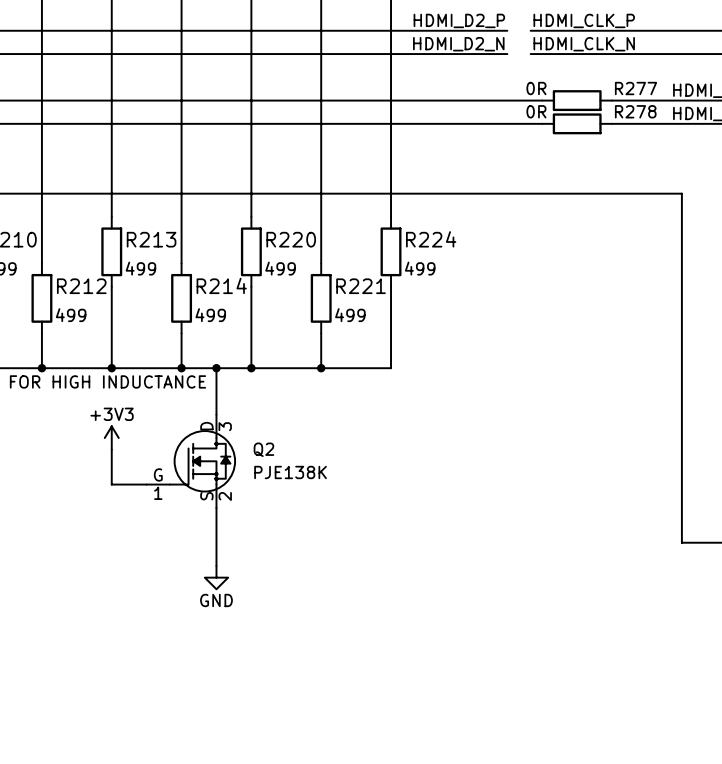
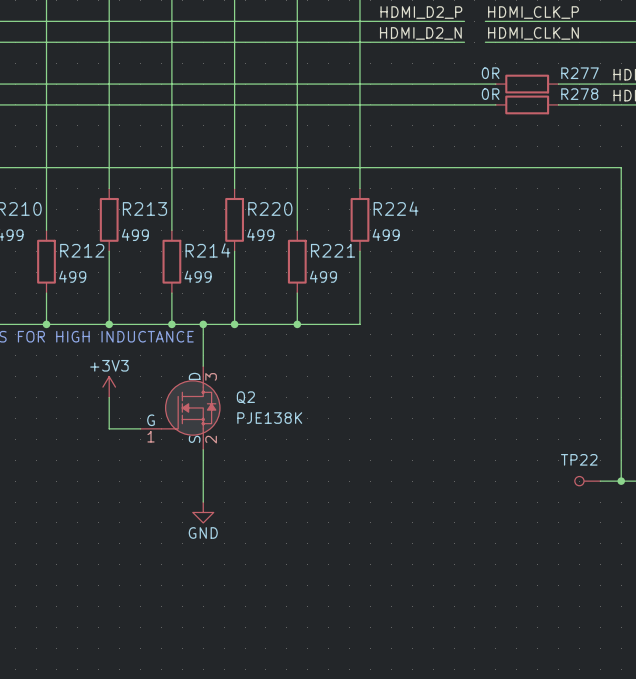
TP22: none -> (587, 481)
wire: none -> (600, 481) (621, 481)
junction: none -> (621, 481)

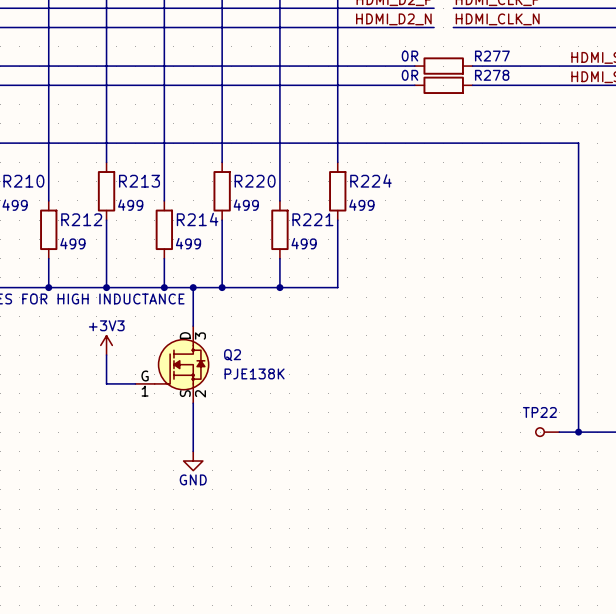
wire: (443, 84) (495, 84) -> (472, 66) (520, 66)
R277 position: (527, 84) -> (443, 66)
wire: (443, 104) (495, 104) -> (472, 85) (520, 85)
R278 position: (527, 104) -> (443, 85)

